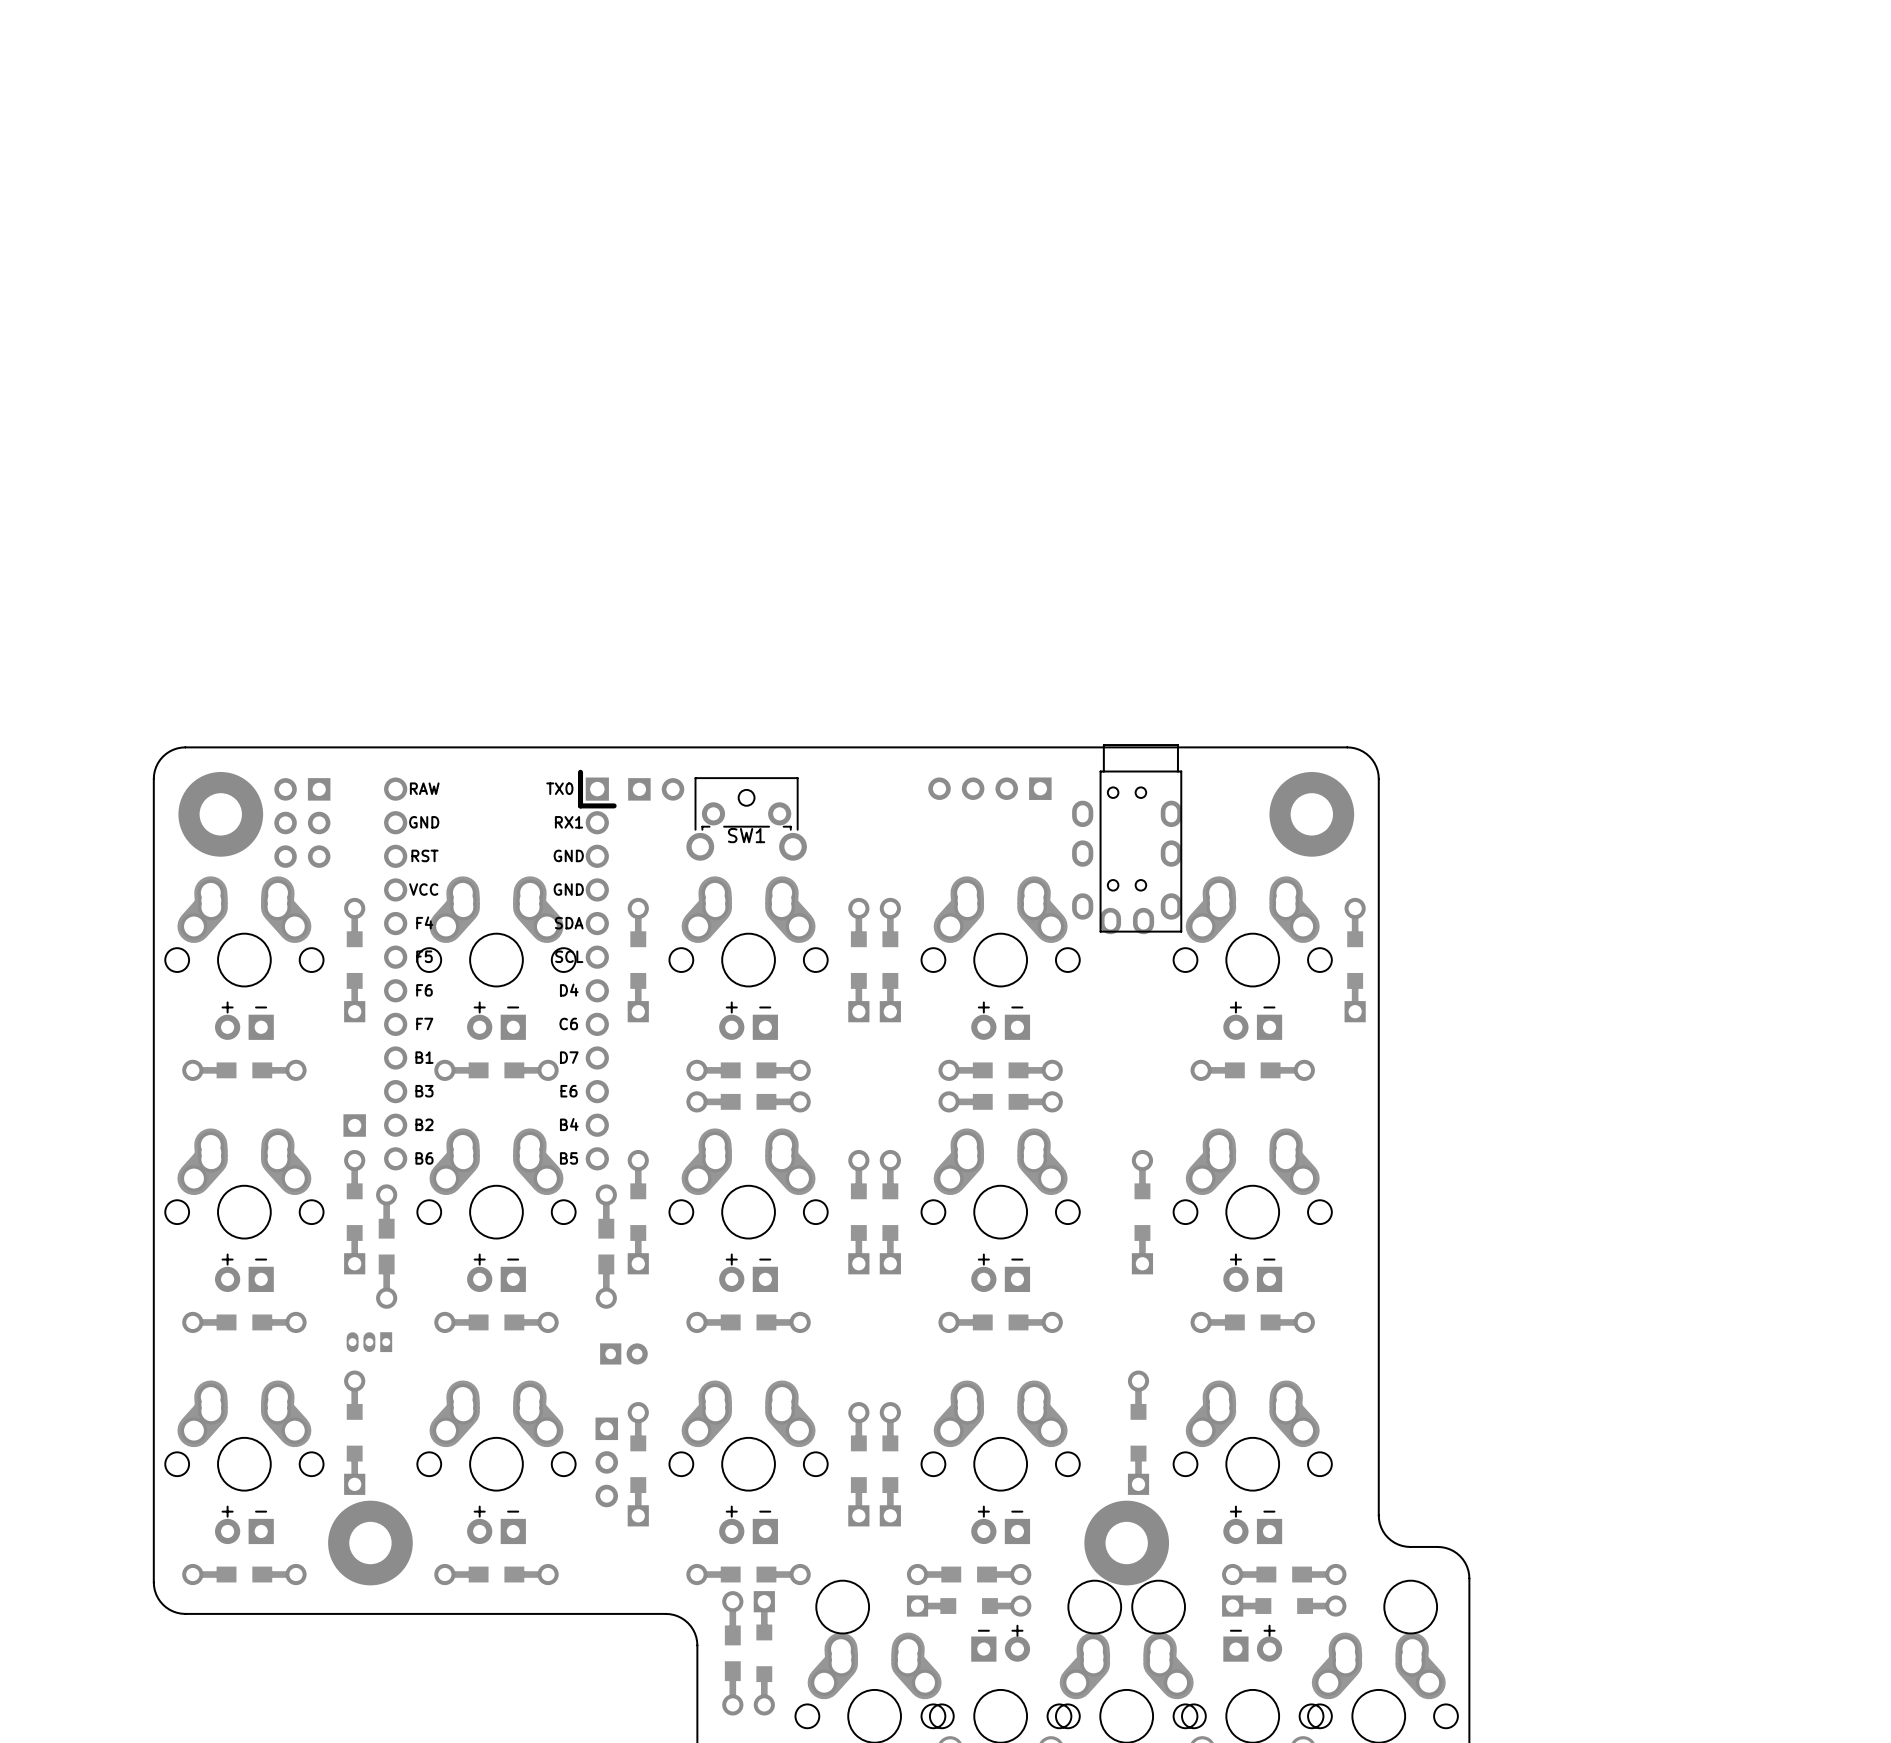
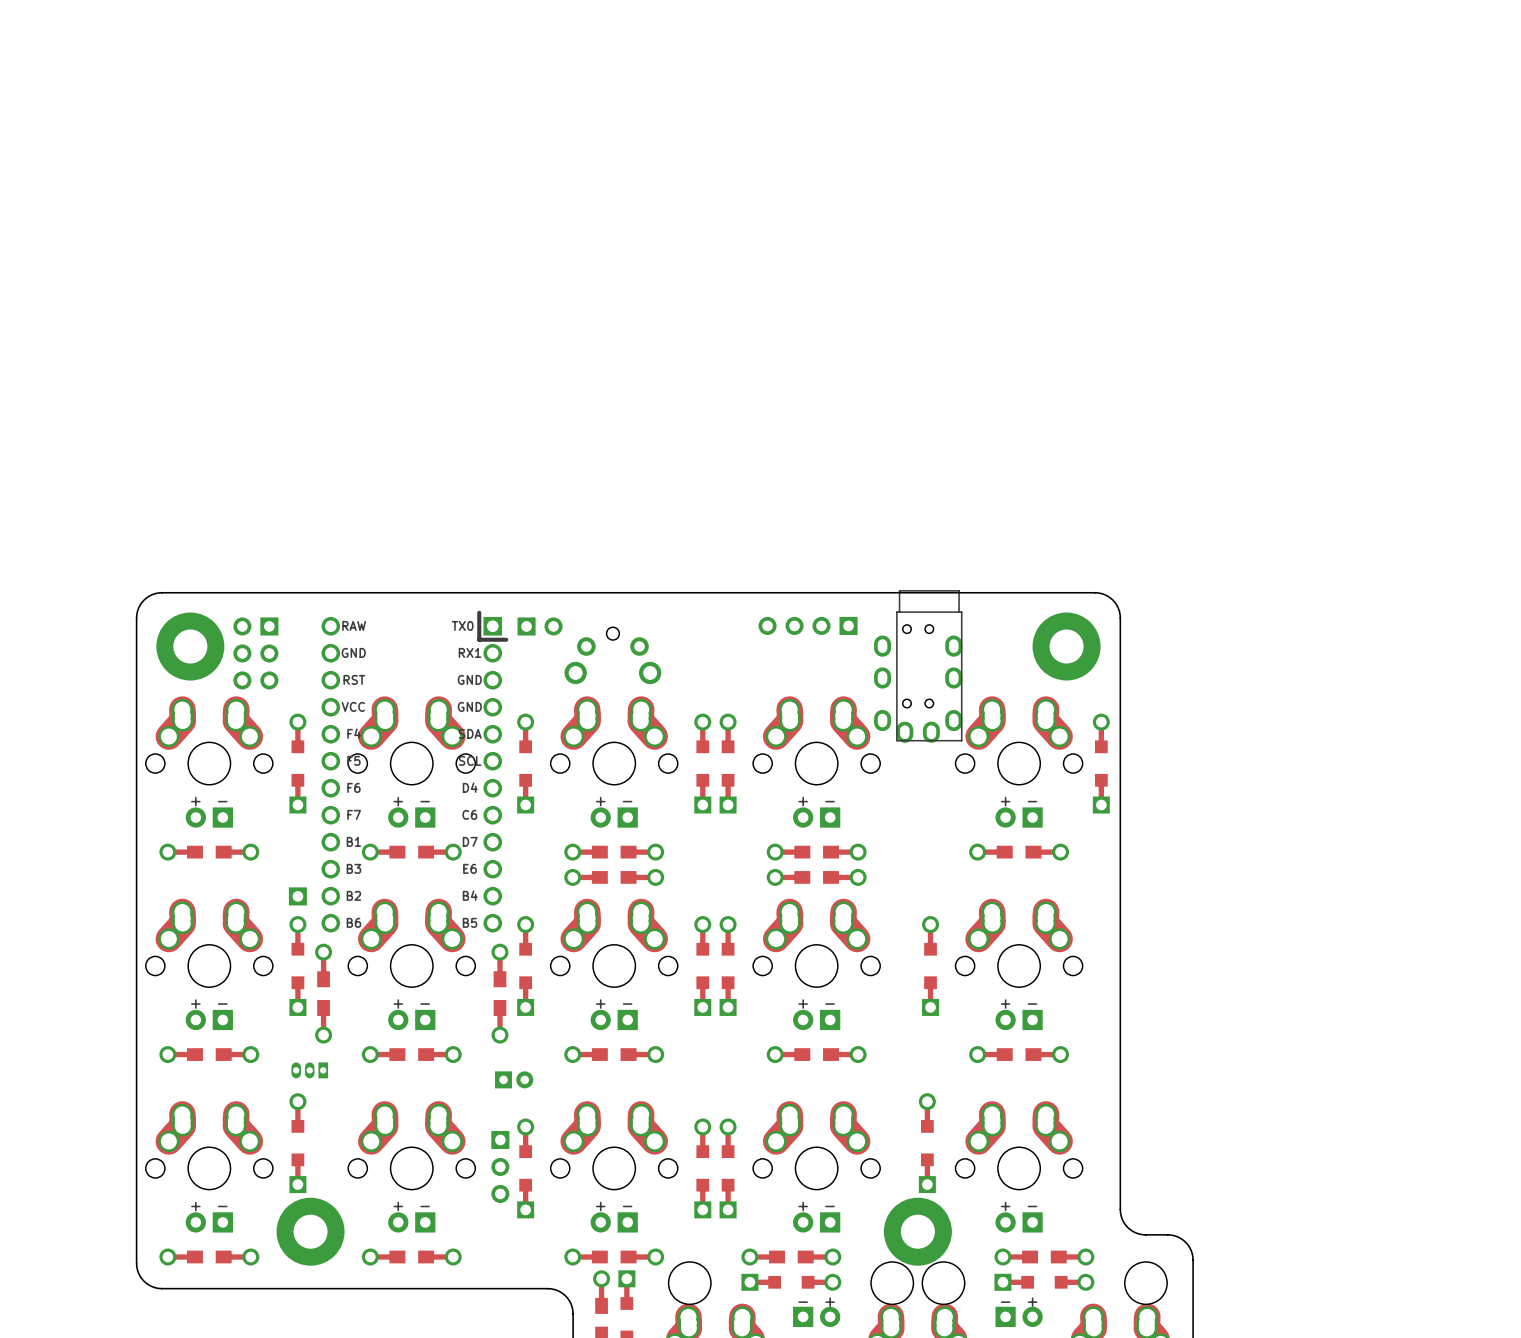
SW1 side: top (746, 819) -> bottom (612, 655)

